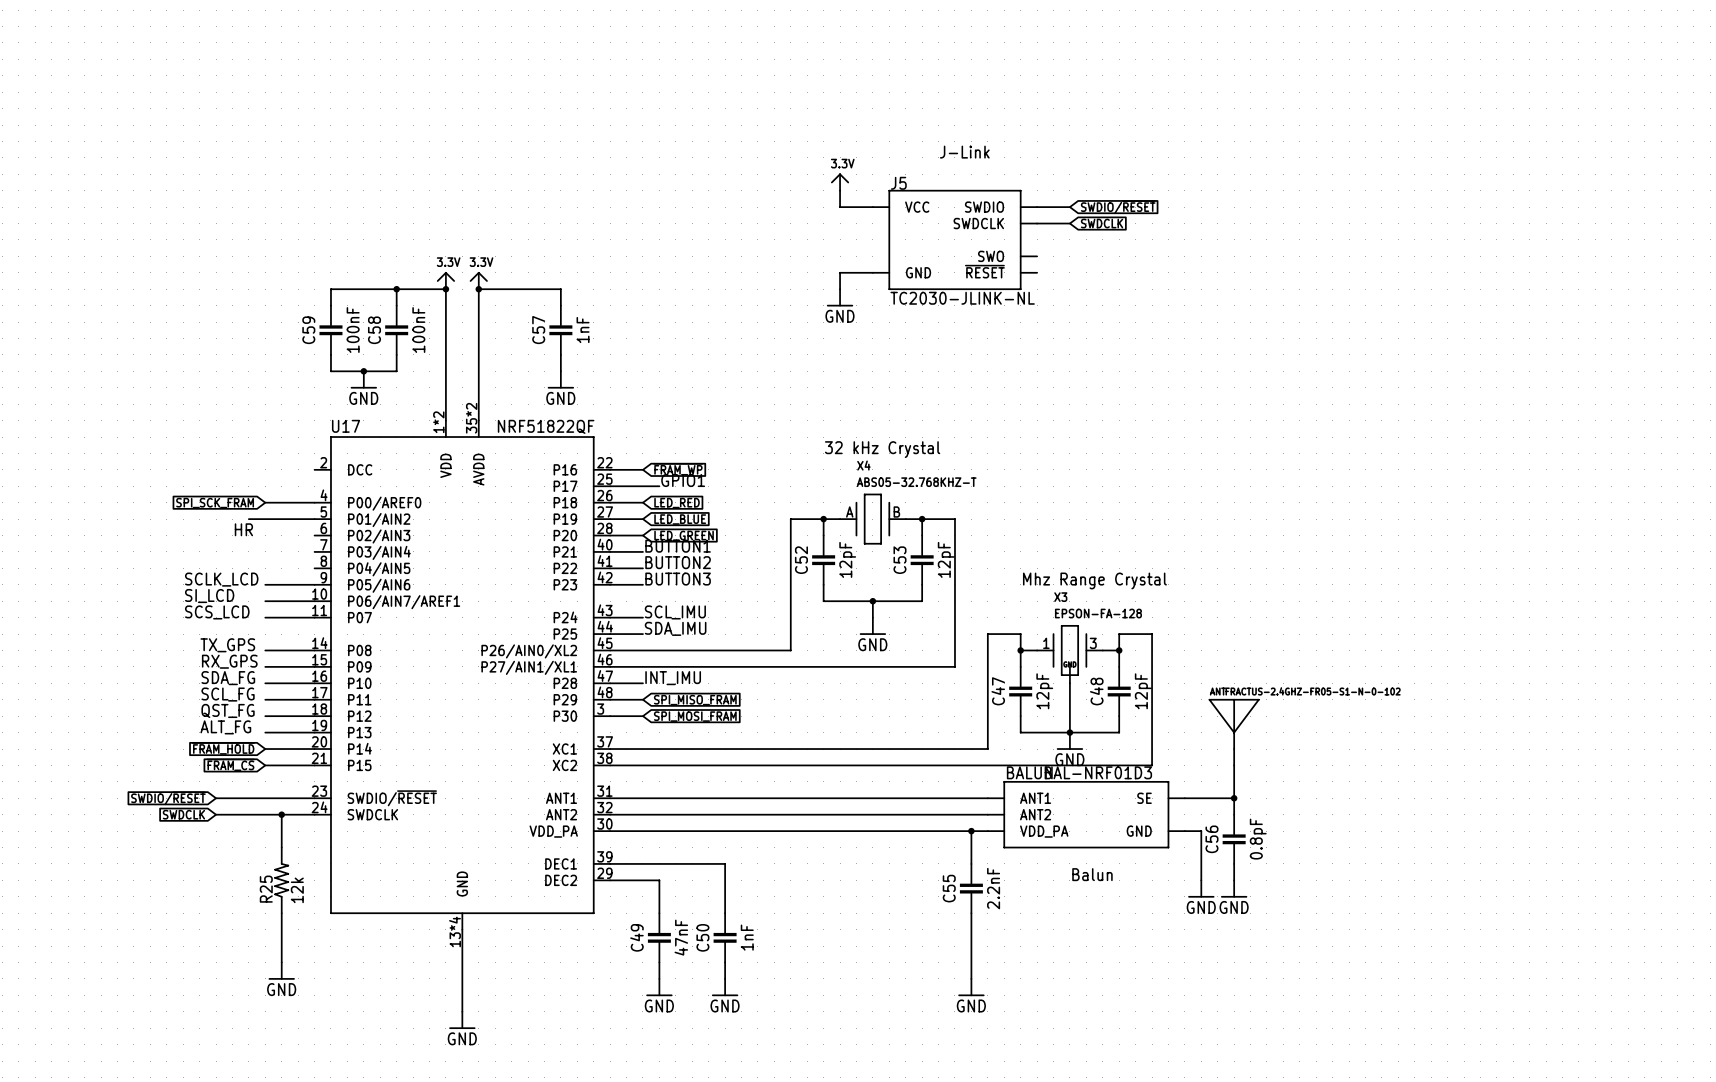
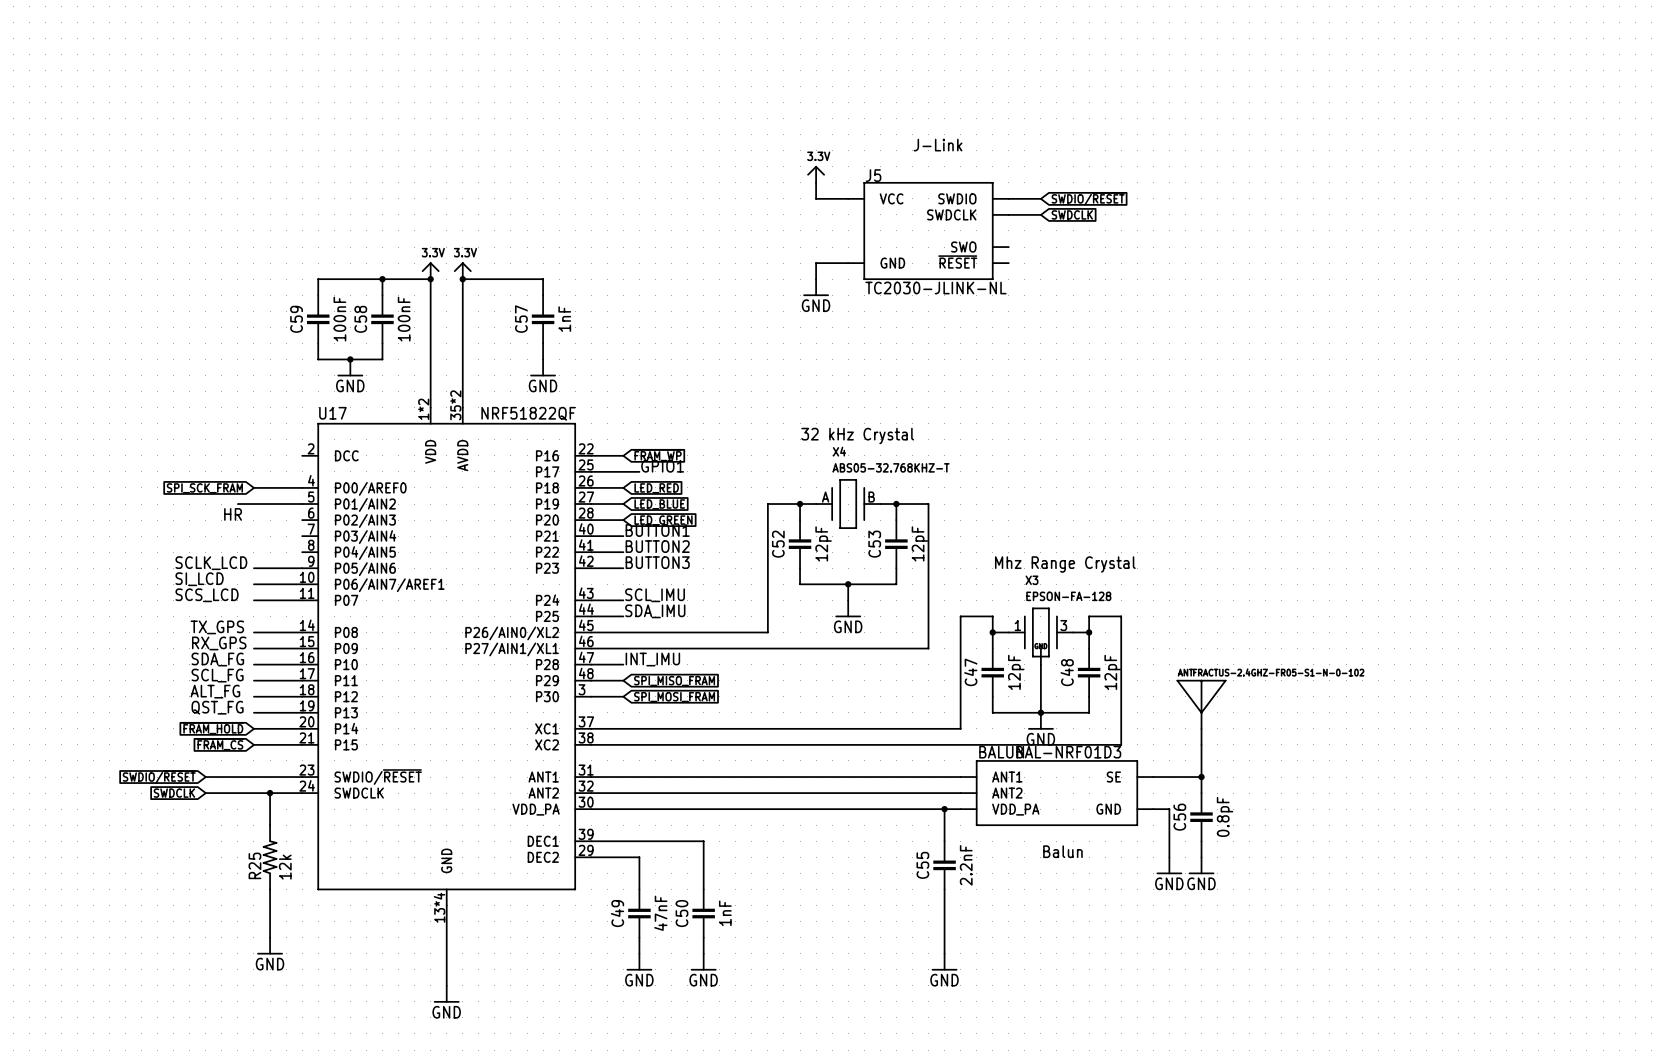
label: QST_FG (228, 710) -> ALT_FG (215, 691)
label: ALT_FG (225, 727) -> QST_FG (217, 707)

